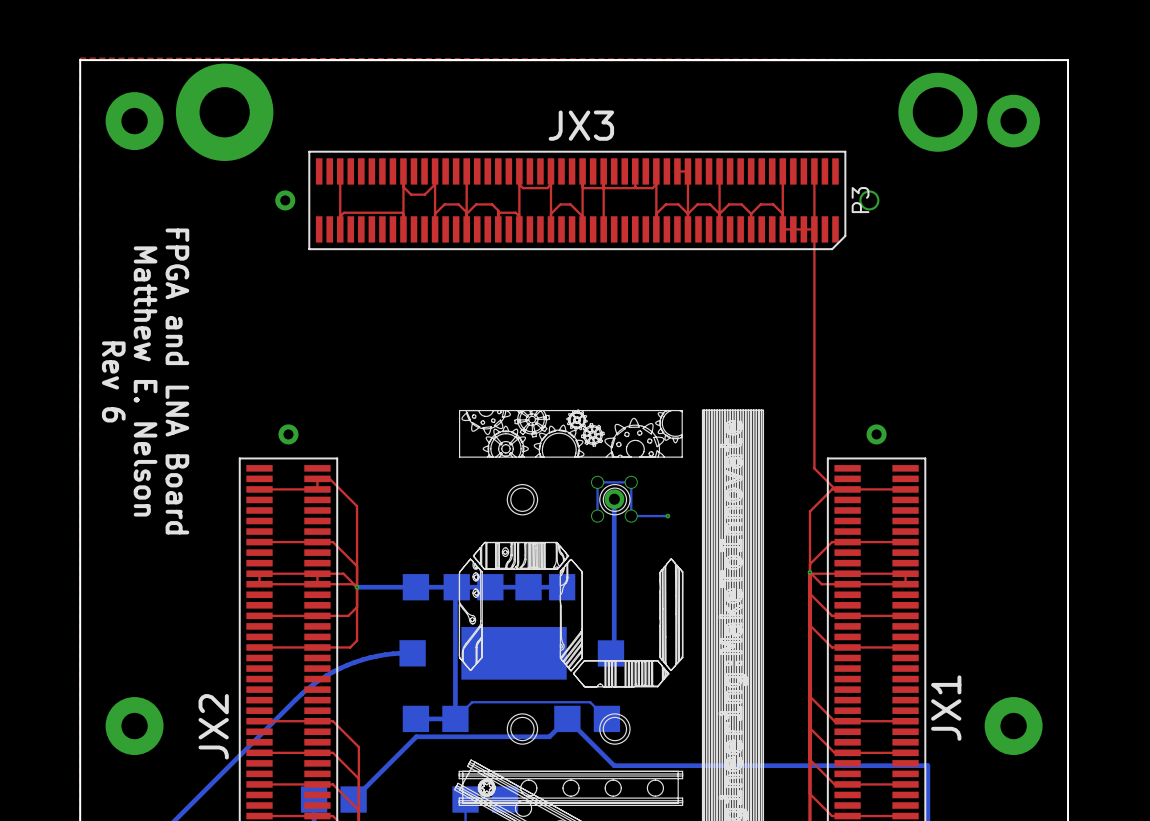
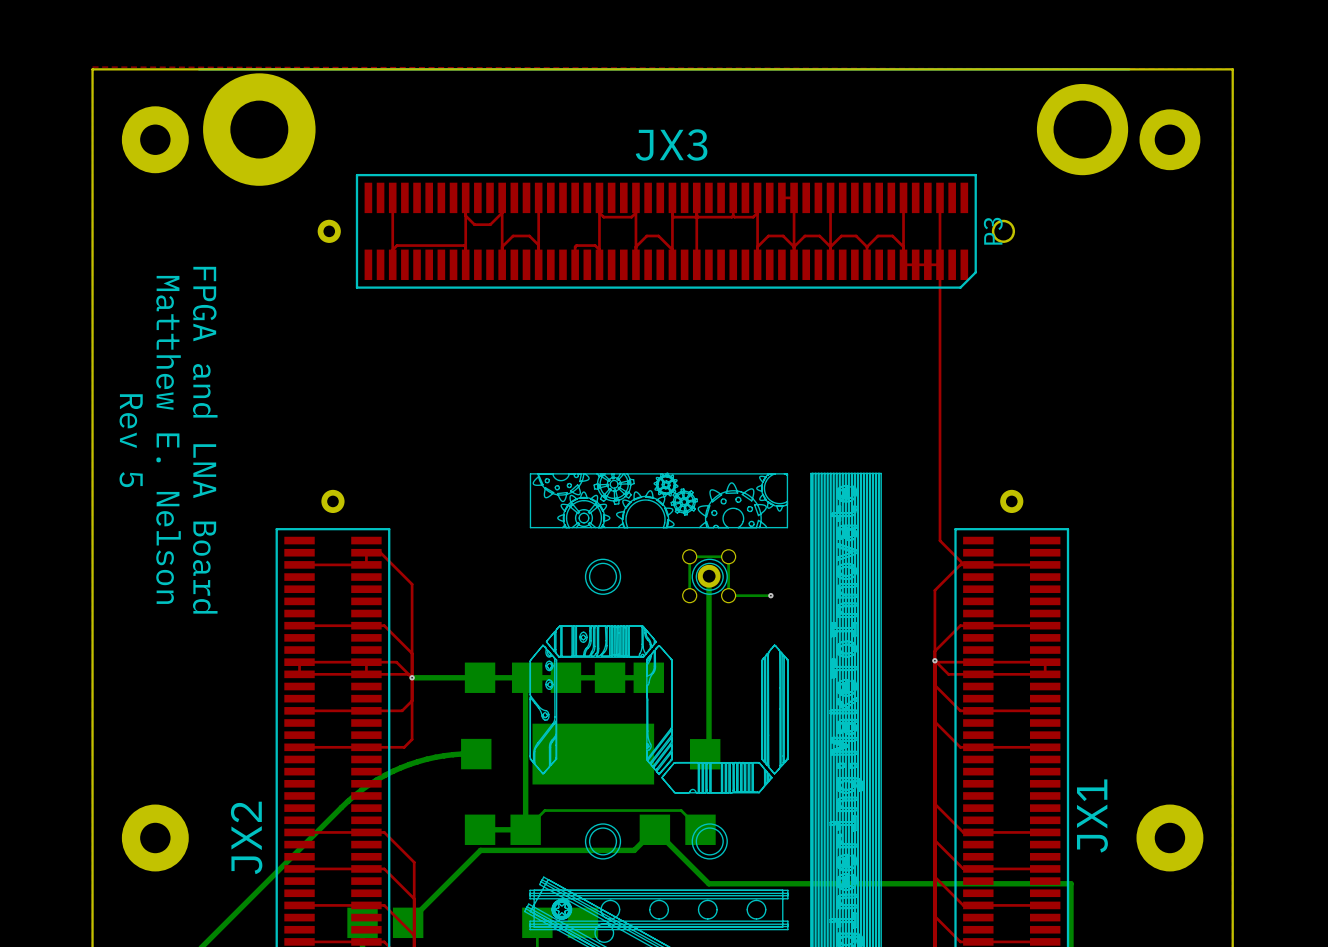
top track: (466, 213) (476, 204) (492, 204) (498, 210) (498, 213) -> none
text: Rev 6 (113, 381) -> Rev 5 (131, 440)

